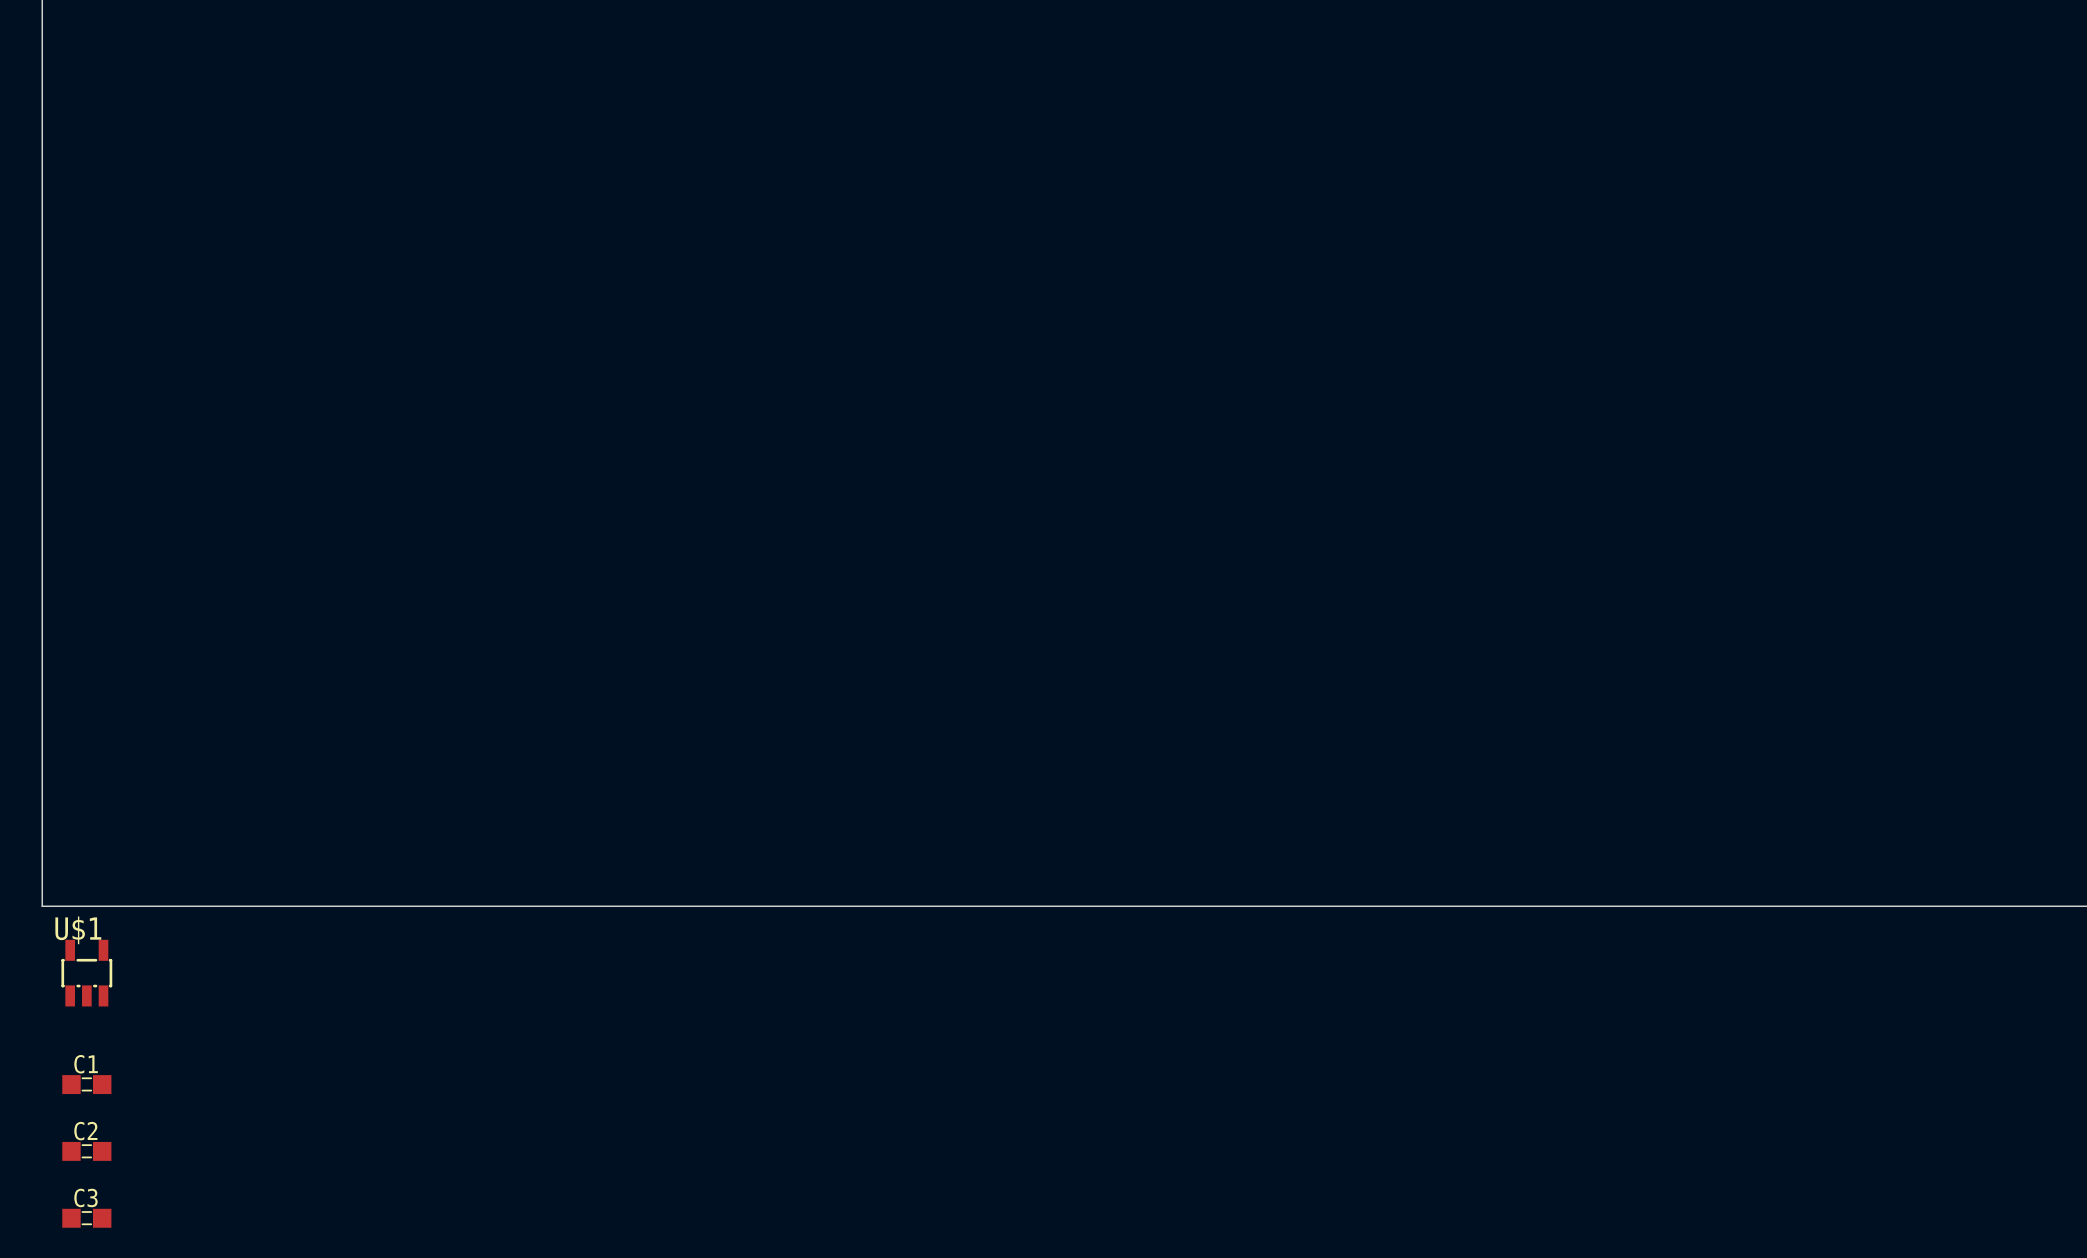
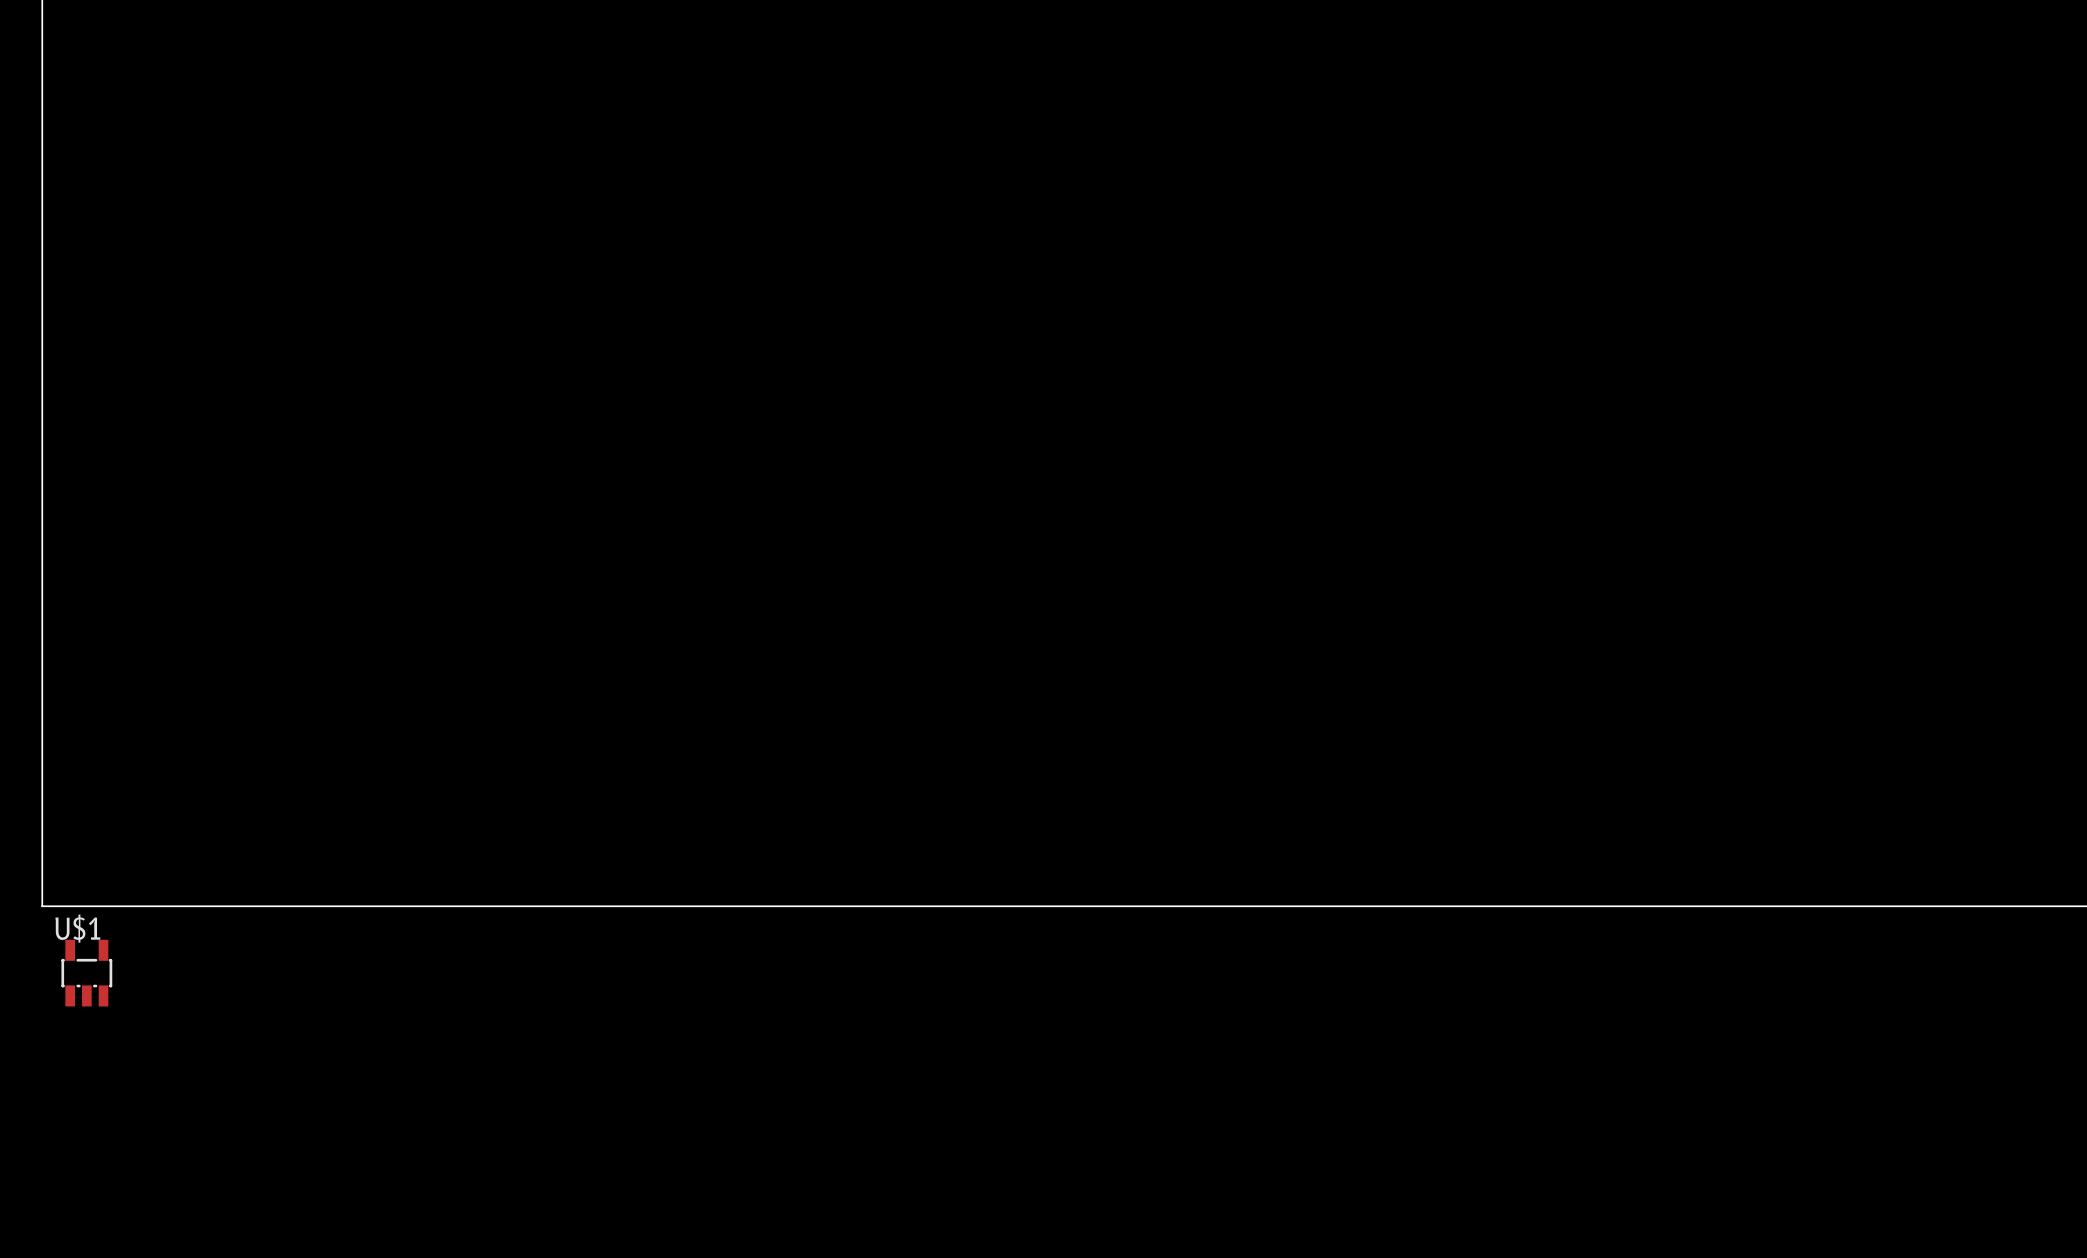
C1: (86, 1084) -> none
C2: (86, 1151) -> none
C3: (86, 1218) -> none

